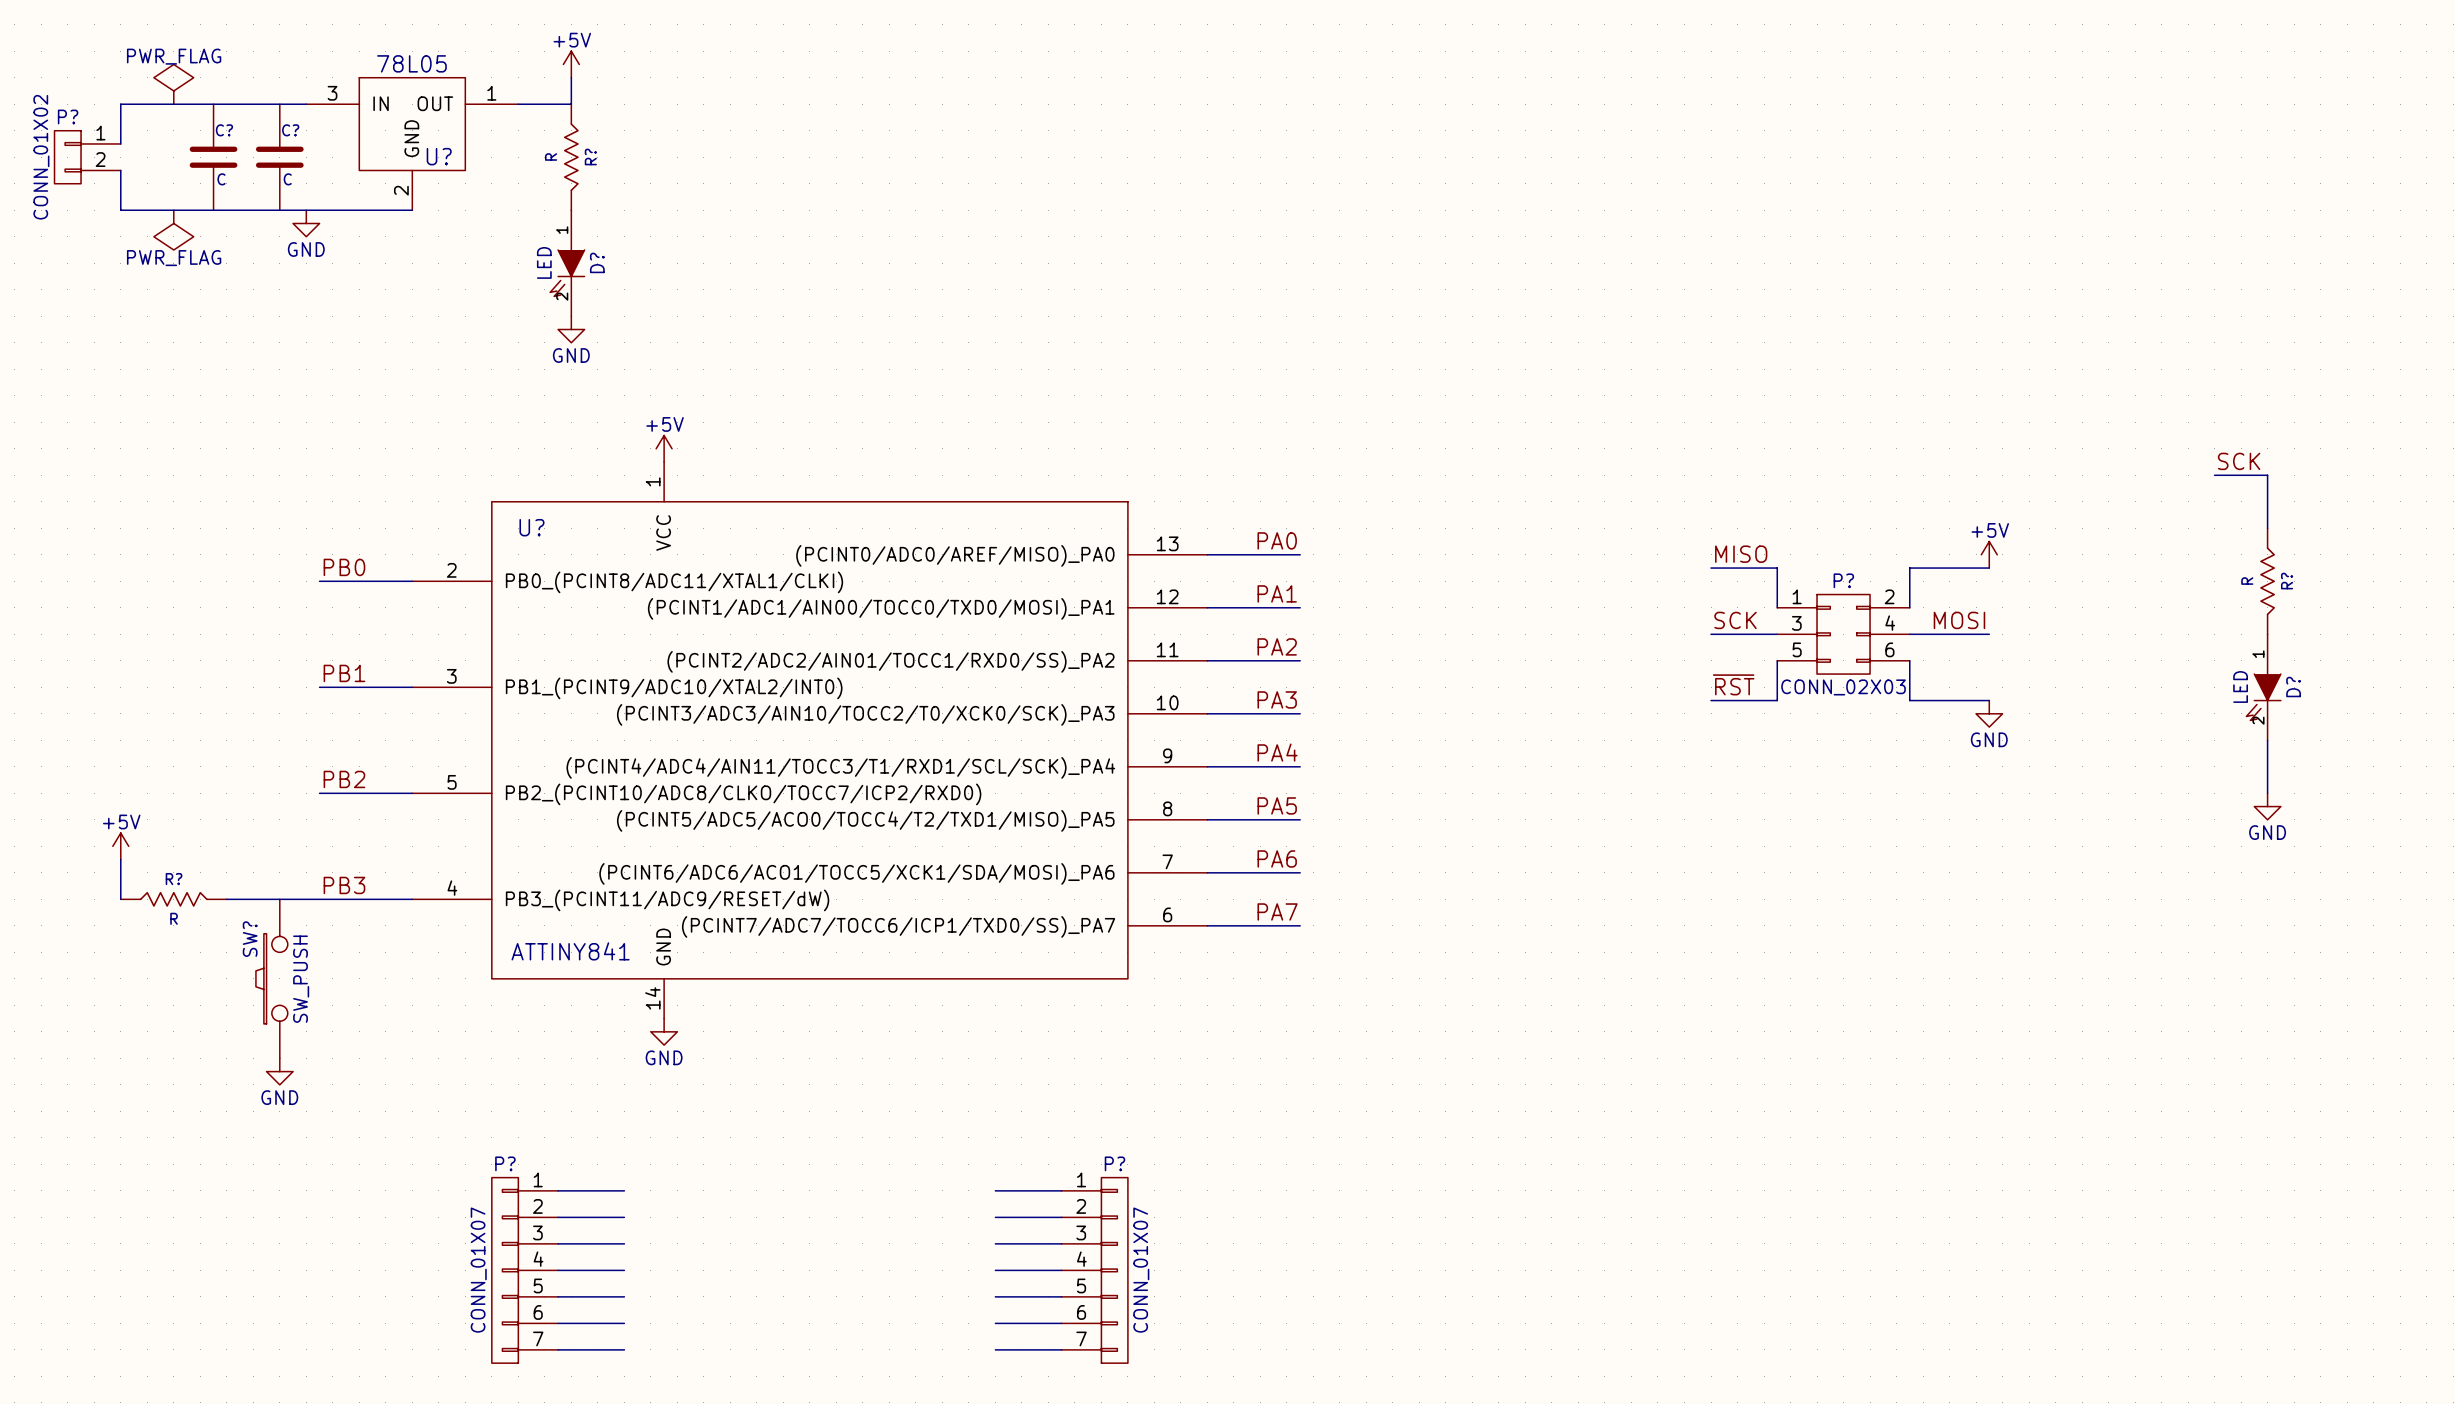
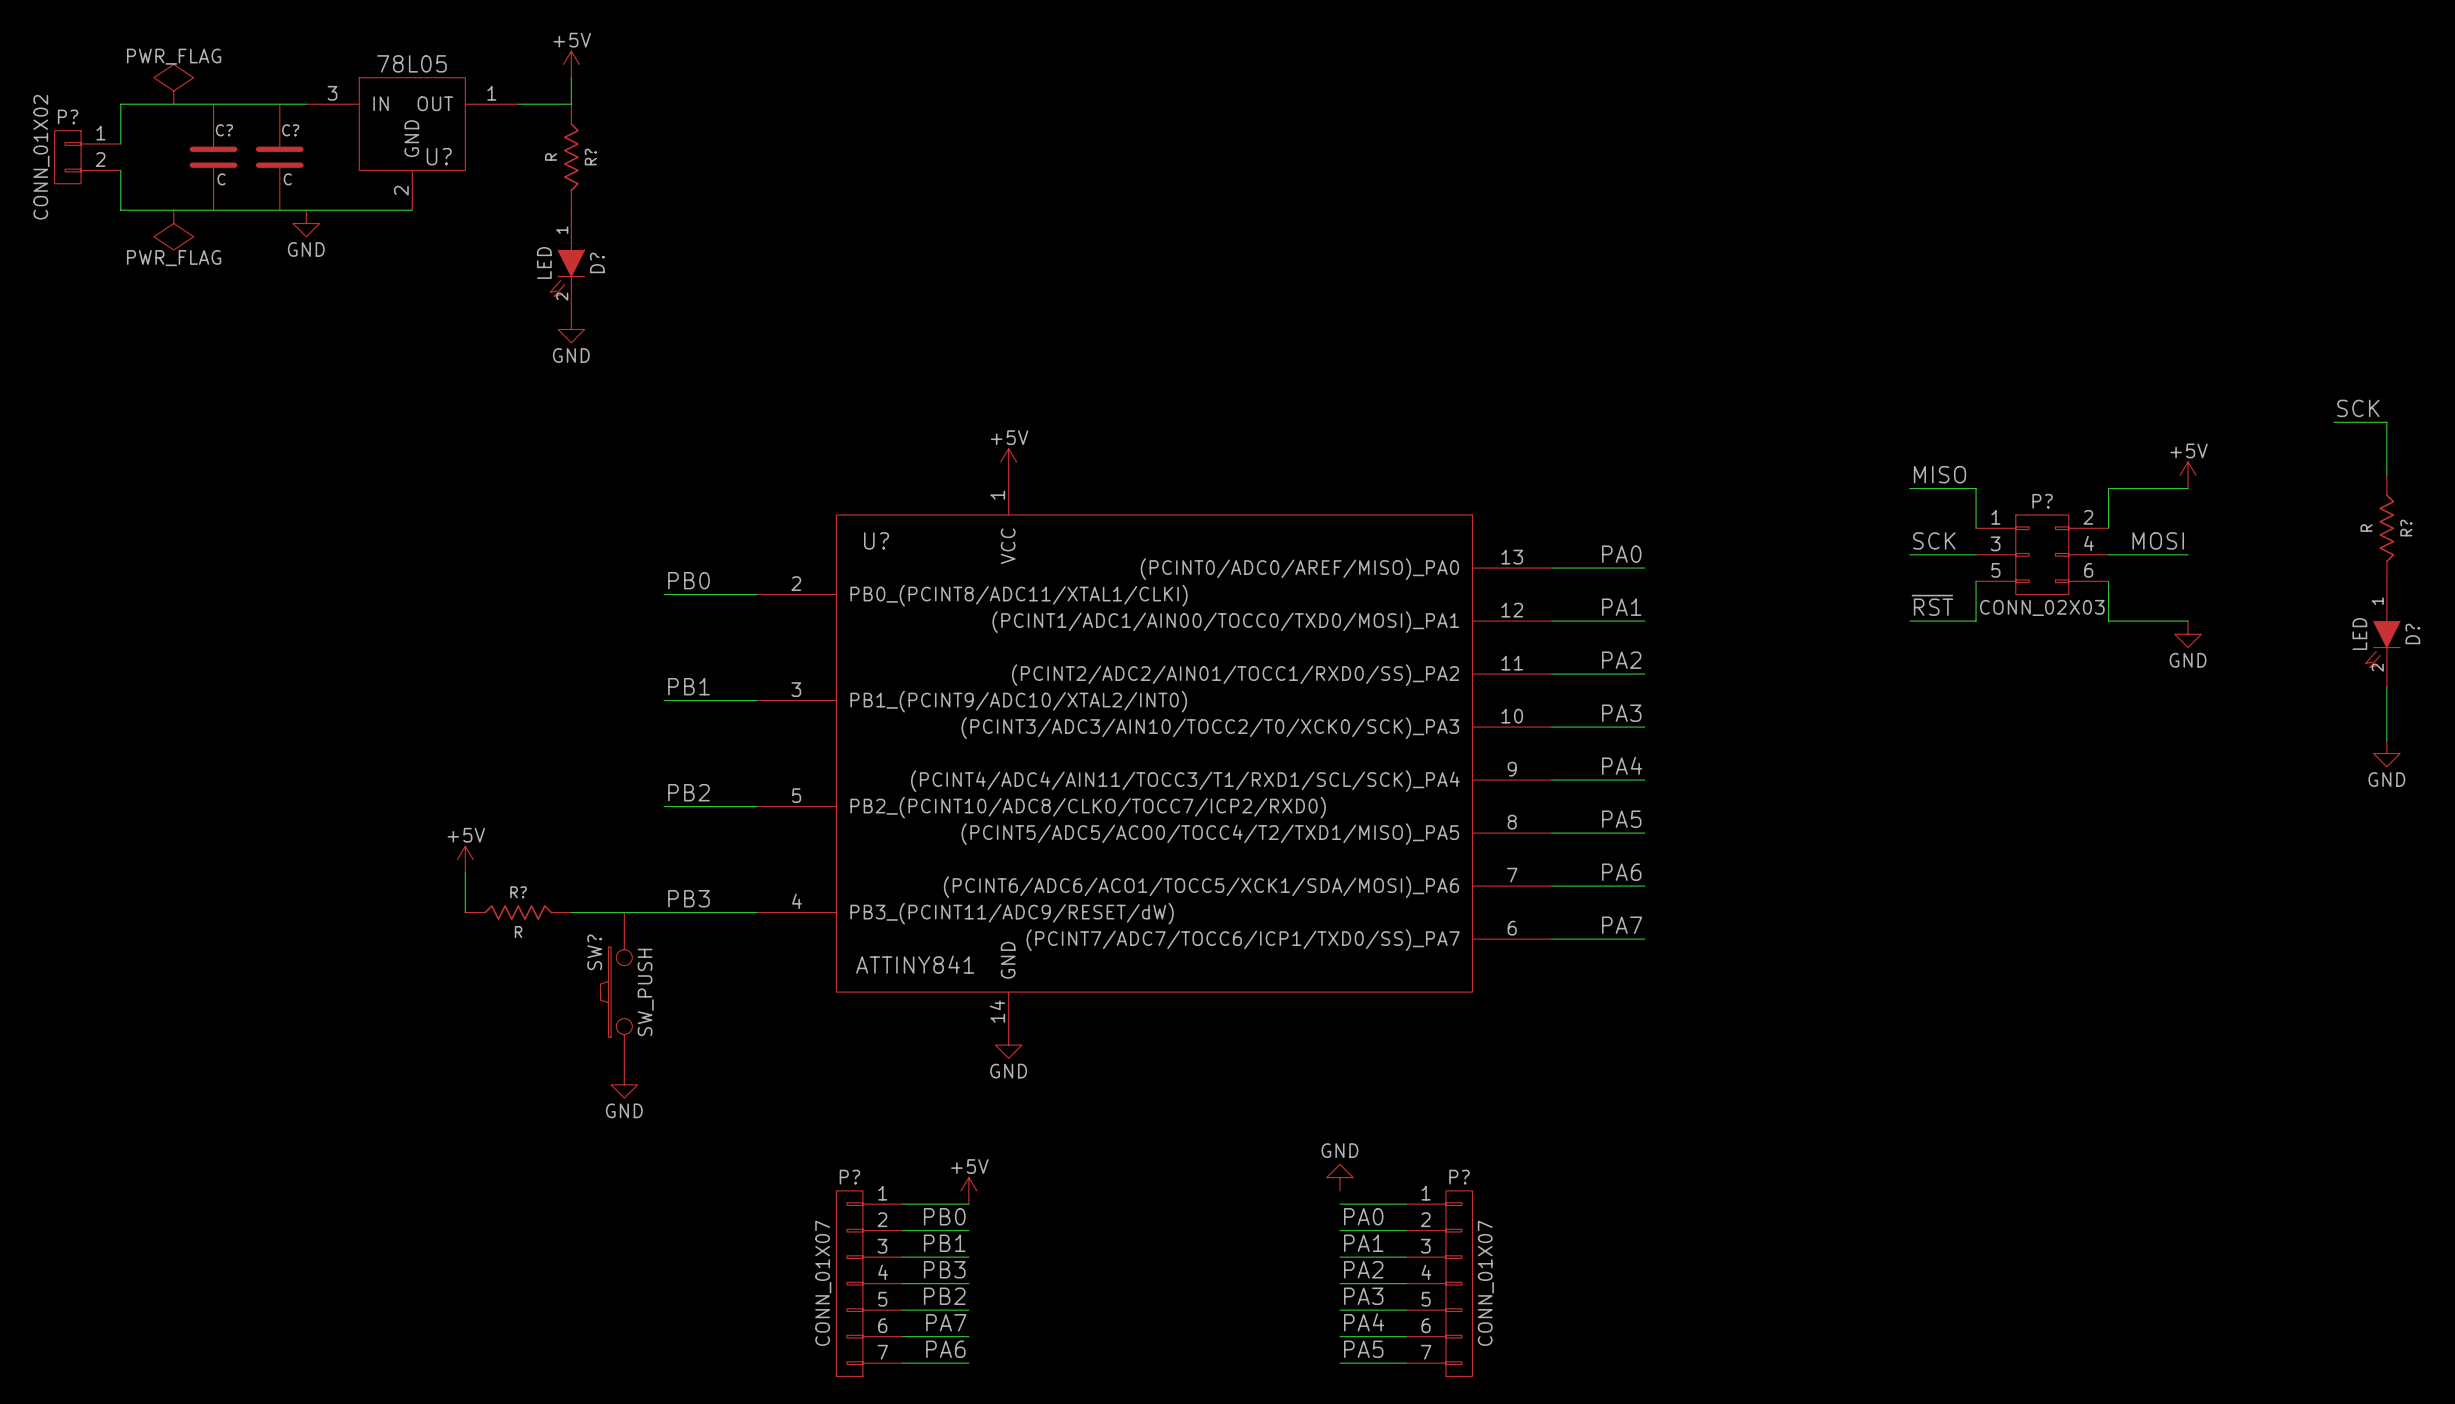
power symbol: +5V (664, 448) -> none
label position: SCK (2239, 461) -> SCK (2358, 408)
power symbol: none -> +5V (1008, 462)
wire: (2214, 475) (2267, 475) (2267, 528) -> (2333, 422) (2386, 422) (2386, 475)
label: PA0 (1277, 540) -> none
label: none -> SCK (1934, 540)
wire: (1207, 554) (1300, 554) -> none
label: none -> PA0 (1621, 554)
label position: MISO (1741, 554) -> MISO (1939, 474)
power symbol position: +5V (1989, 554) -> +5V (2188, 475)
label: PB0 (344, 567) -> none
wire: none -> (1551, 568) (1644, 568)
wire: (1711, 568) (1777, 568) (1777, 607) -> (1909, 488) (1976, 488) (1976, 528)
wire: (1989, 568) (1909, 568) (1909, 607) -> (2188, 488) (2108, 488) (2108, 528)
label: none -> PB0 (689, 580)
wire: (319, 581) (412, 581) -> none
R? position: (2267, 581) -> (2386, 528)
label: PA1 (1277, 593) -> none
wire: none -> (664, 594) (756, 594)
wire: (1207, 607) (1300, 607) -> none
label: none -> PA1 (1621, 607)
label: SCK (1735, 620) -> none
label position: MOSI (1959, 620) -> MOSI (2158, 540)
wire: none -> (1551, 621) (1644, 621)
wire: (1711, 634) (1777, 634) -> (1909, 554) (1976, 554)
P? position: (1843, 634) -> (2042, 554)
wire: (1909, 634) (1989, 634) -> (2108, 554) (2188, 554)
power symbol: none -> GND (2188, 634)
label: PA2 (1277, 646) -> none
wire: (1207, 660) (1300, 660) -> none
label: none -> PA2 (1621, 660)
wire: (1777, 660) (1777, 700) (1711, 700) -> (1976, 581) (1976, 621) (1909, 621)
wire: (1909, 660) (1909, 700) (1989, 700) -> (2108, 581) (2108, 621) (2188, 621)
label: PB1 (344, 673) -> none
wire: none -> (1551, 674) (1644, 674)
label position: ~{RST} (1733, 684) -> ~{RST} (1932, 605)
label: none -> PB1 (689, 686)
wire: (319, 687) (412, 687) -> none
D? position: (2263, 687) -> (2382, 634)
label: PA3 (1277, 699) -> none
wire: none -> (664, 700) (756, 700)
wire: (1207, 713) (1300, 713) -> none
label: none -> PA3 (1621, 713)
power symbol: GND (1989, 713) -> none
wire: none -> (1551, 727) (1644, 727)
U?: ATTINY841 (809, 740) -> none
wire: (2267, 740) (2267, 793) -> (2386, 687) (2386, 740)
label: PA4 (1277, 752) -> none
U?: none -> ATTINY841 (1154, 753)
power symbol: none -> GND (2386, 753)
label: none -> PA4 (1622, 765)
wire: (1207, 766) (1300, 766) -> none
label: PB2 (344, 779) -> none
wire: none -> (1551, 780) (1644, 780)
label: none -> PB2 (689, 792)
wire: (319, 793) (412, 793) -> none
label: PA5 (1277, 805) -> none
wire: none -> (664, 806) (756, 806)
power symbol: GND (2267, 806) -> none
wire: (1207, 819) (1300, 819) -> none
label: none -> PA5 (1621, 819)
wire: none -> (1551, 833) (1644, 833)
power symbol: +5V (120, 846) -> none
label: PA6 (1277, 858) -> none
wire: (120, 859) (120, 899) -> none
power symbol: none -> +5V (465, 859)
wire: none -> (465, 872) (465, 912)
wire: (1207, 872) (1300, 872) -> none
label: none -> PA6 (1621, 872)
label: PB3 (344, 885) -> none
wire: none -> (1551, 886) (1644, 886)
label: none -> PB3 (689, 898)
R?: R (173, 899) -> none
wire: (226, 899) (412, 899) -> none
label: PA7 (1277, 911) -> none
R?: none -> R (518, 912)
wire: none -> (571, 912) (756, 912)
wire: (1207, 925) (1300, 925) -> none
label: none -> PA7 (1622, 925)
wire: none -> (1551, 939) (1644, 939)
SW?: SW_PUSH (271, 978) -> none
SW?: none -> SW_PUSH (616, 992)
power symbol position: GND (664, 1031) -> GND (624, 1084)
power symbol: none -> GND (1008, 1045)
power symbol: GND (279, 1071) -> none
power symbol: none -> GND (1339, 1177)
wire: (558, 1190) (624, 1190) -> none
power symbol: none -> +5V (968, 1190)
wire: (995, 1190) (1061, 1190) -> (902, 1204) (968, 1204)
wire: none -> (1339, 1204) (1406, 1204)
label: none -> PB0 (944, 1216)
label: none -> PA0 (1363, 1216)
wire: (558, 1217) (624, 1217) -> none
wire: (995, 1217) (1061, 1217) -> (902, 1230) (968, 1230)
wire: none -> (1339, 1230) (1406, 1230)
wire: (558, 1243) (624, 1243) -> none
label: none -> PB1 (944, 1243)
wire: (995, 1243) (1061, 1243) -> (902, 1257) (968, 1257)
label: none -> PA1 (1363, 1243)
wire: none -> (1339, 1257) (1406, 1257)
label: none -> PB3 (944, 1269)
label: none -> PA2 (1363, 1269)
P?: CONN_01X07 (524, 1270) -> none
wire: (558, 1270) (624, 1270) -> none
wire: (995, 1270) (1061, 1270) -> (902, 1283) (968, 1283)
P?: CONN_01X07 (1094, 1270) -> none
P?: none -> CONN_01X07 (869, 1283)
wire: none -> (1339, 1283) (1406, 1283)
P?: none -> CONN_01X07 (1439, 1283)
wire: (558, 1296) (624, 1296) -> none
label: none -> PB2 (944, 1296)
wire: (995, 1296) (1061, 1296) -> (902, 1310) (968, 1310)
label: none -> PA3 (1363, 1296)
wire: none -> (1339, 1310) (1406, 1310)
label: none -> PA7 (946, 1322)
label: none -> PA4 (1364, 1322)
wire: (558, 1323) (624, 1323) -> none
wire: (995, 1323) (1061, 1323) -> (902, 1336) (968, 1336)
wire: none -> (1339, 1336) (1406, 1336)
wire: (558, 1349) (624, 1349) -> none
label: none -> PA6 (945, 1349)
wire: (995, 1349) (1061, 1349) -> (902, 1363) (968, 1363)
label: none -> PA5 (1363, 1349)
wire: none -> (1339, 1363) (1406, 1363)

